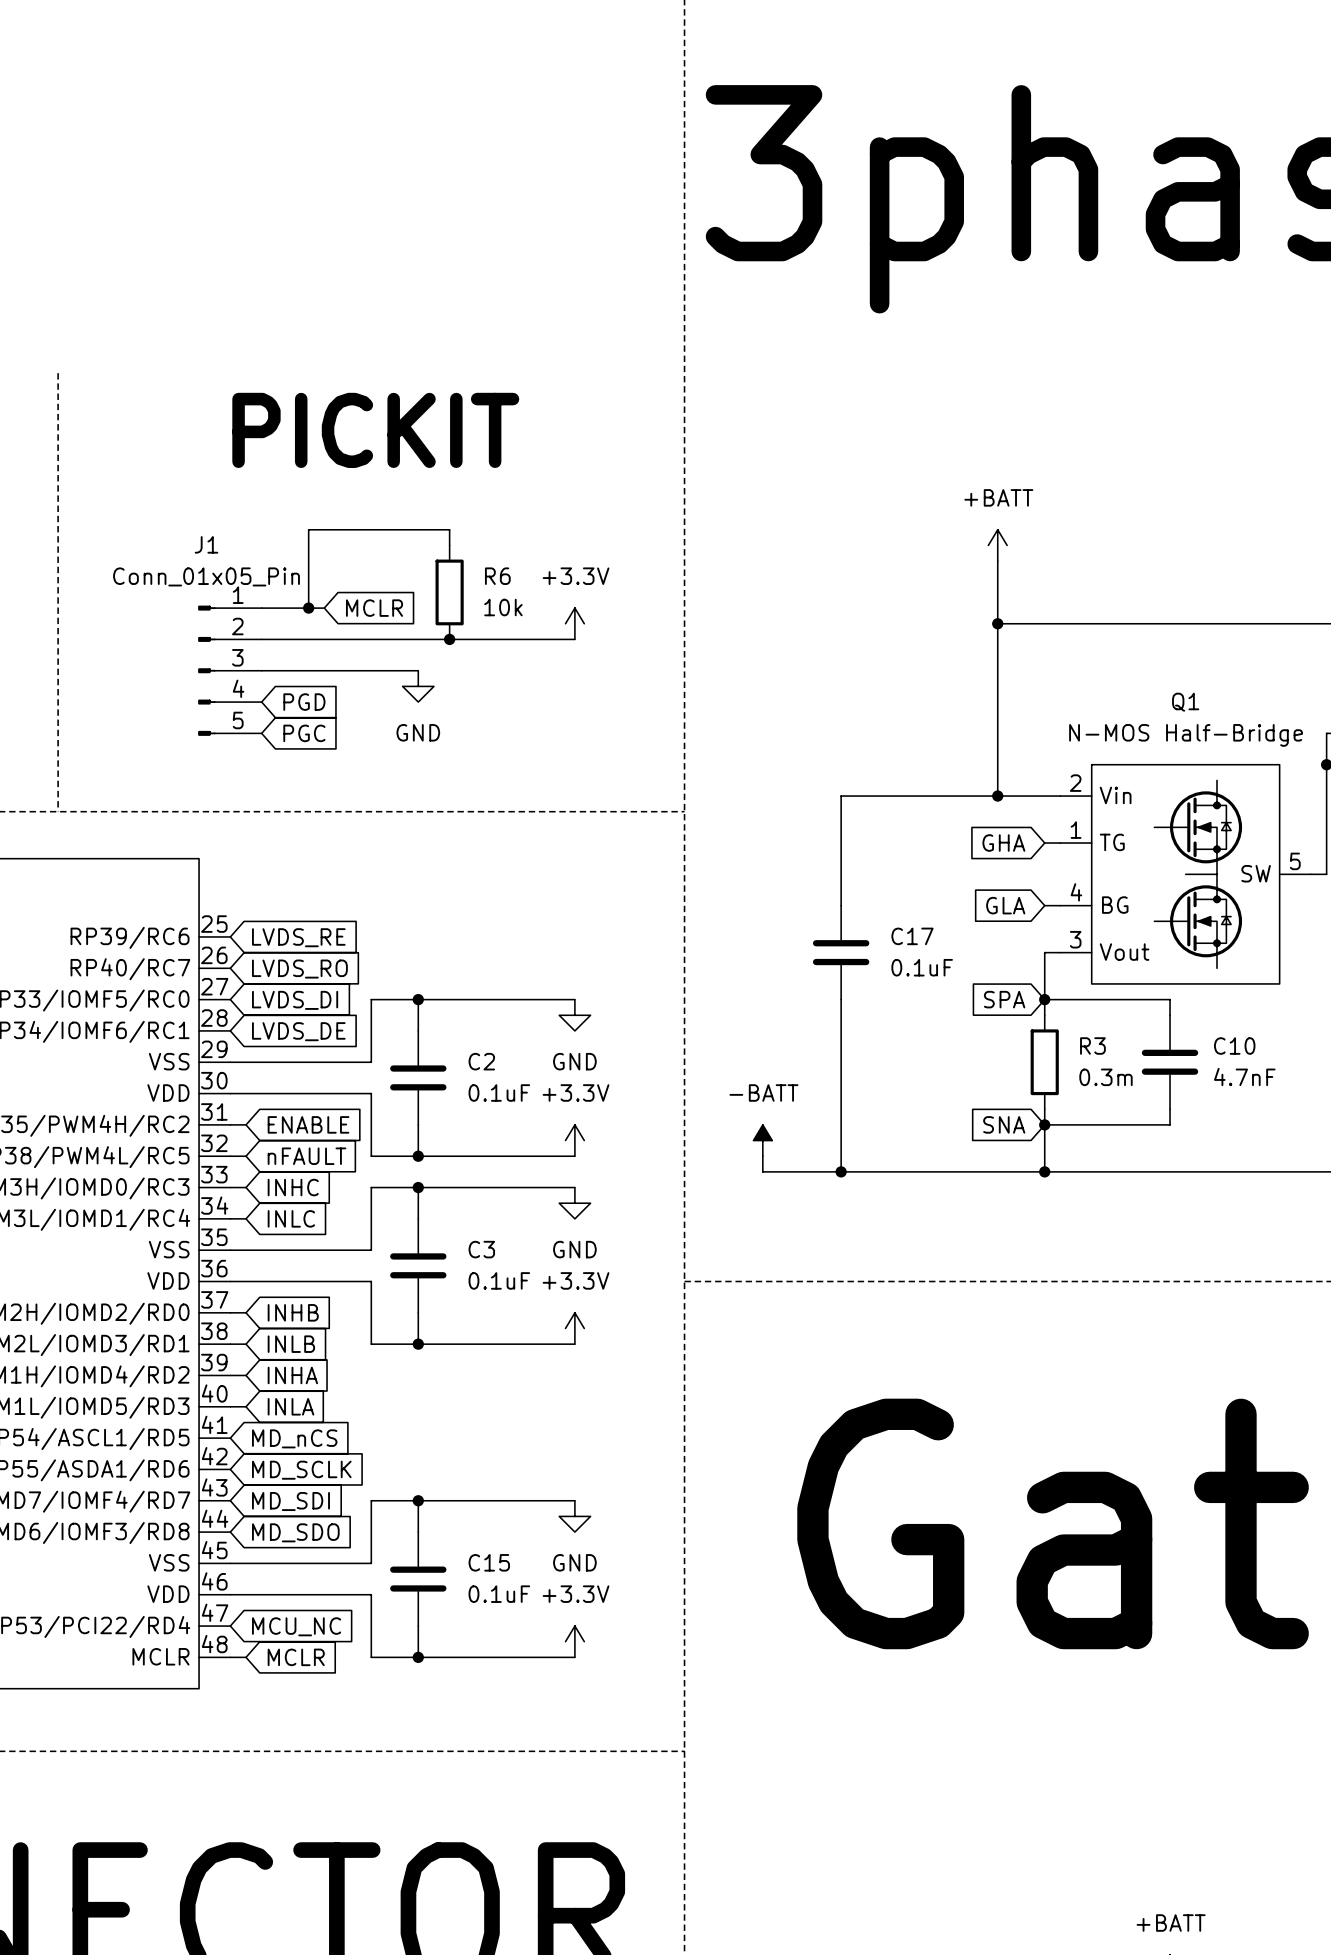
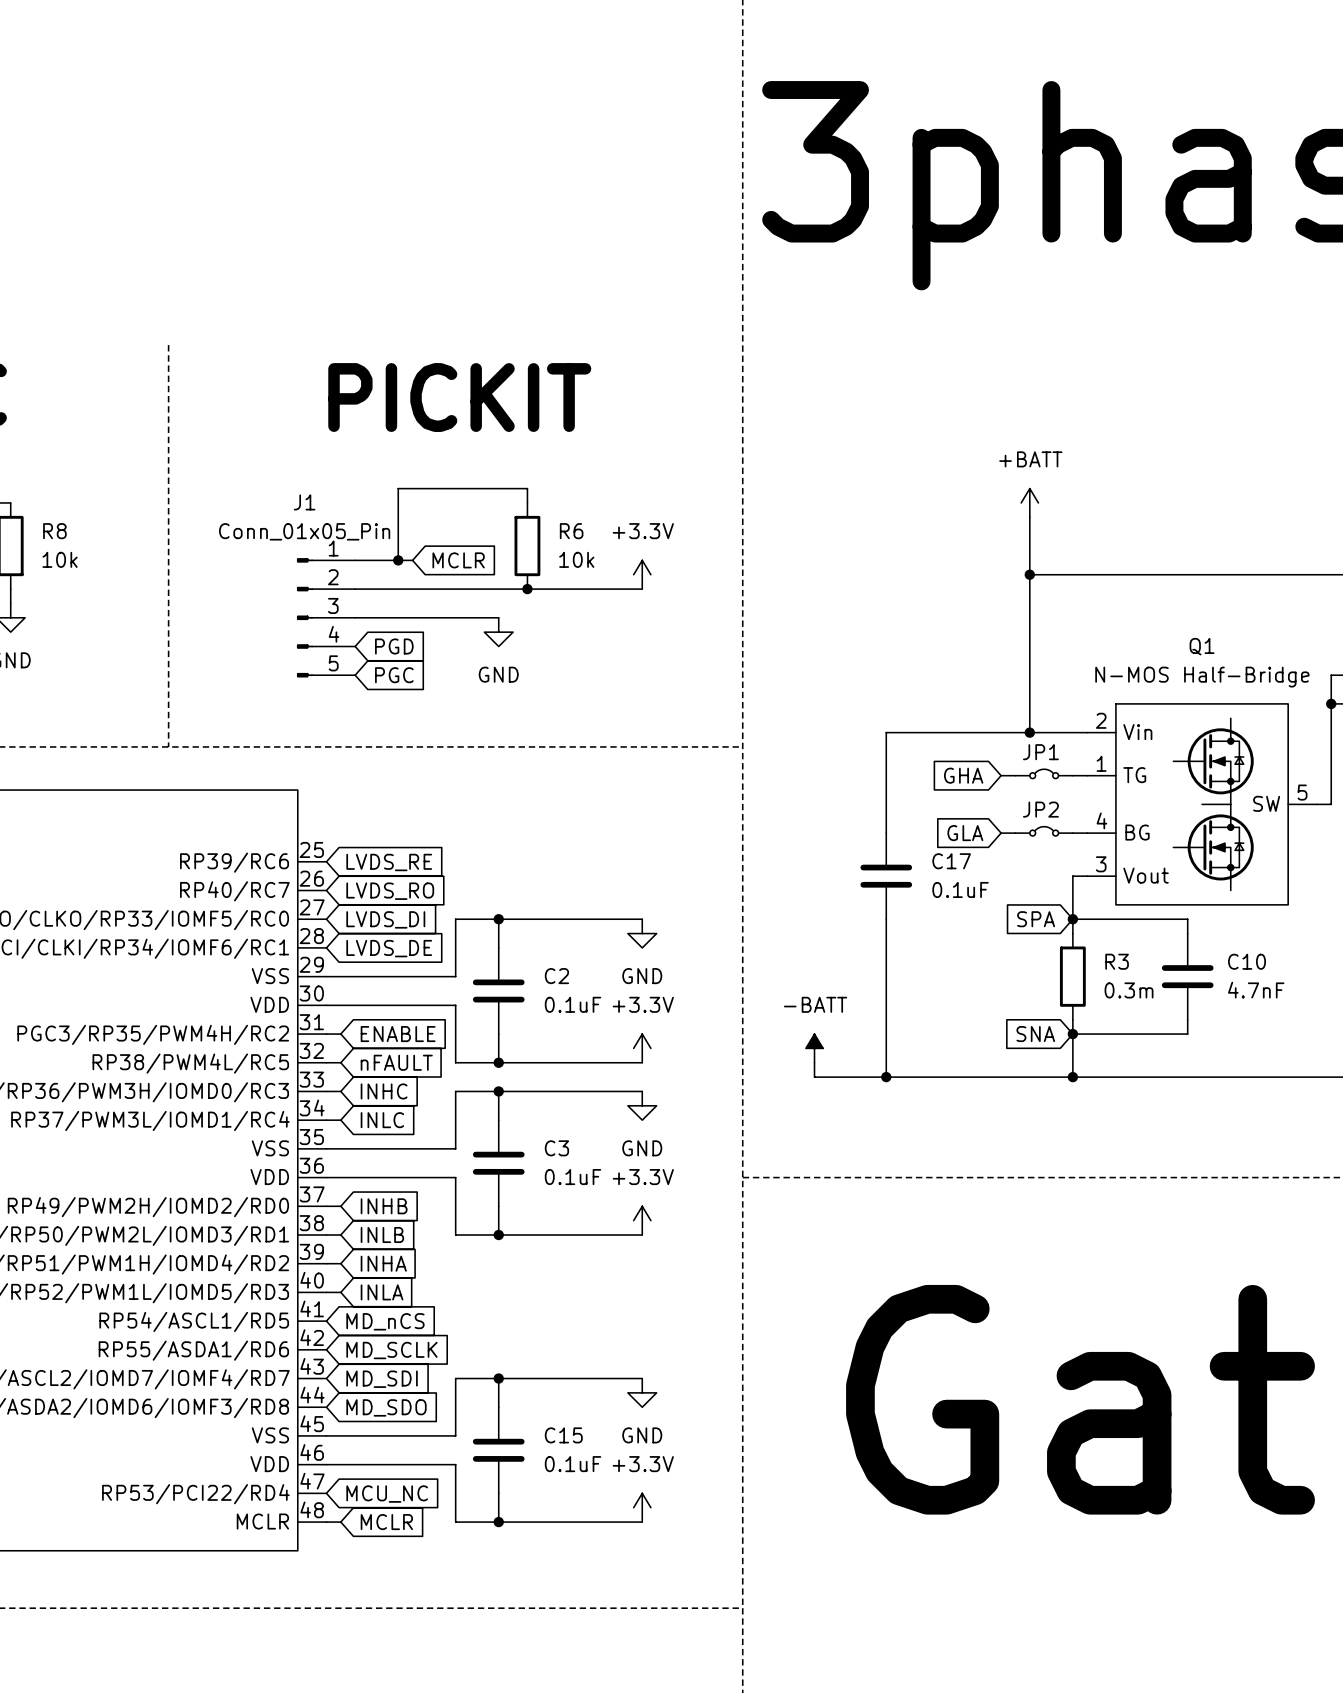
JP1: none -> (1044, 773)
wire: none -> (1001, 775) (1015, 775)
global label position: GHA (1003, 843) -> GHA (963, 775)
JP2: none -> (1044, 831)
wire: none -> (1001, 833) (1015, 833)
global label position: GLA (1005, 905) -> GLA (965, 833)

